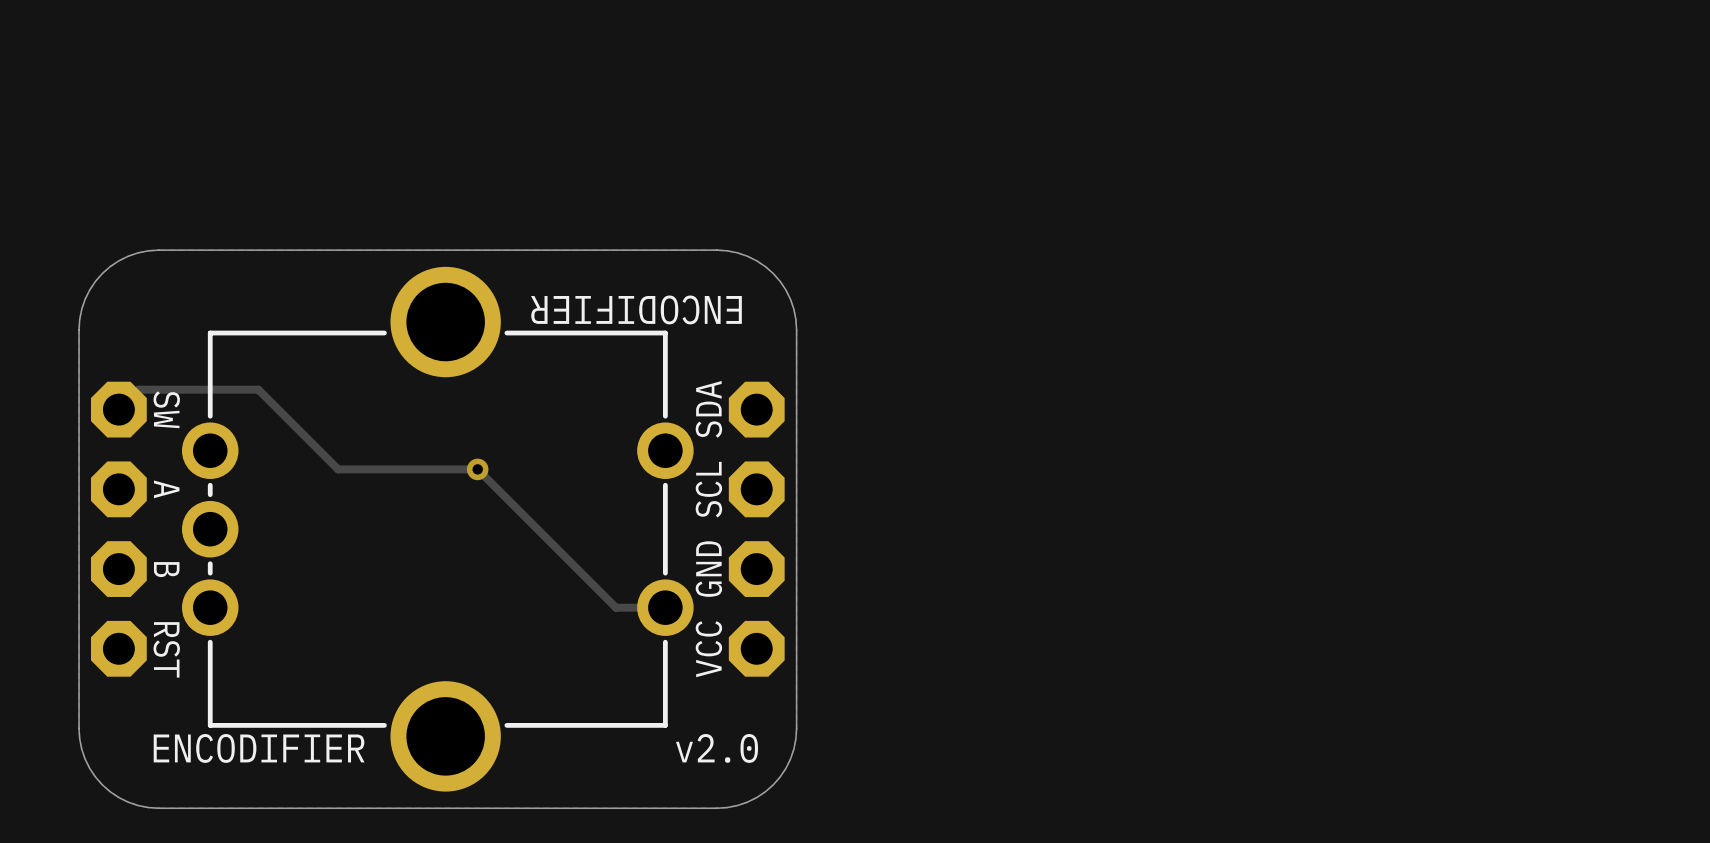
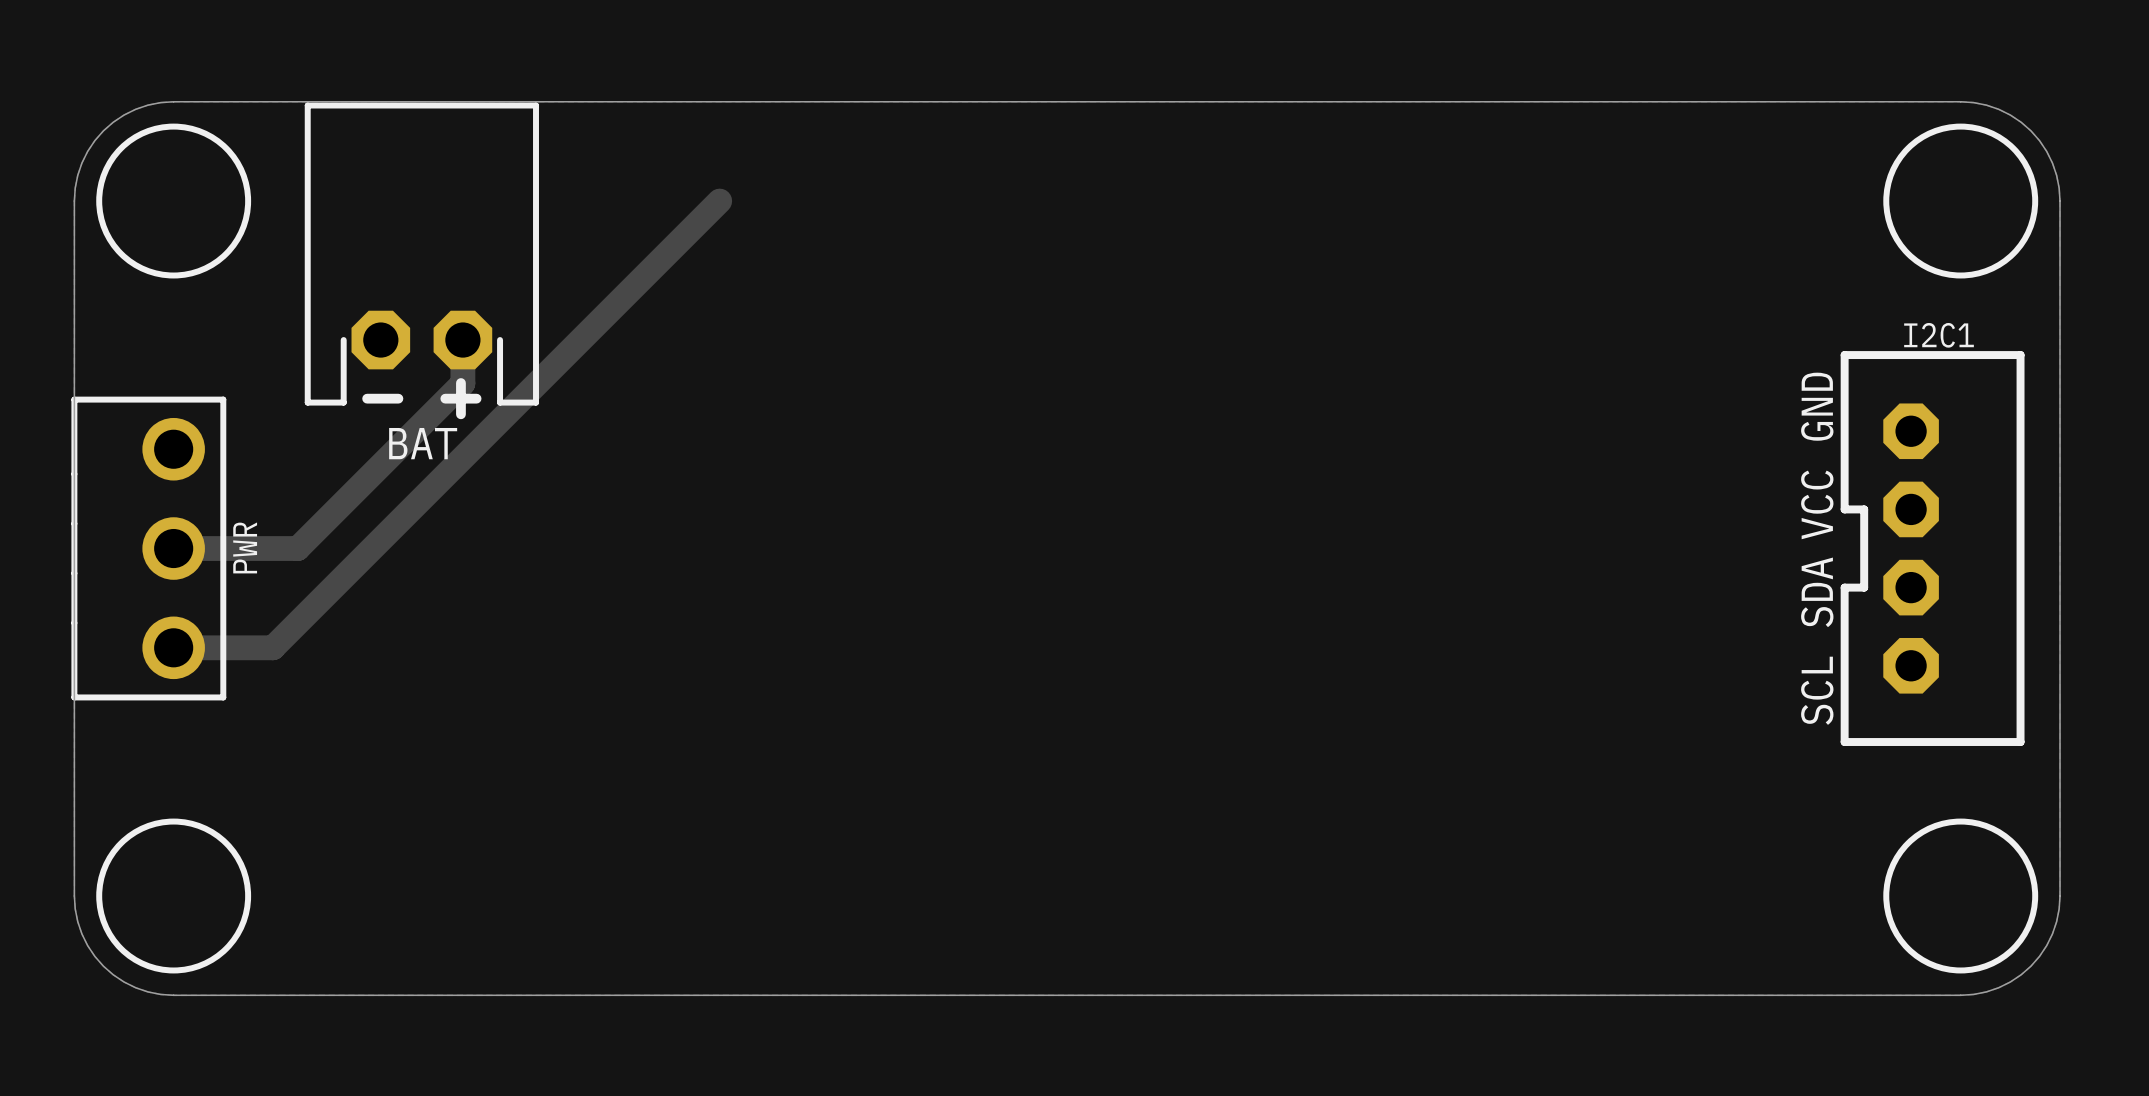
drawing: none -> [96, 123, 252, 279]
drawing: none -> [1883, 123, 2039, 279]
track: none -> (719, 201) (272, 647) (173, 647)
BAT: none -> (421, 260)
track: none -> (462, 340) (462, 383) (297, 548) (173, 548)
text: ENCODIFIER (636, 309) -> none
board edge: (79, 329) (85, 299) (102, 273) (128, 256) (148, 250) (716, 250) (737, 252) (765, 266) (780, 281) (790, 299) (796, 329) (795, 738) (790, 759) (773, 784) (747, 802) (716, 808) -> (74, 399) (74, 201) (77, 175) (87, 151) (103, 130) (113, 122) (135, 109) (160, 102) (1960, 101) (1986, 105) (1998, 109) (2021, 122) (2039, 140) (2052, 163) (2056, 175) (2060, 201) (2060, 896) (2056, 921) (2052, 934) (2039, 956) (2021, 974) (1998, 987) (1986, 991) (1960, 995) (868, 995)
track: (118, 409) (138, 389) (258, 389) (338, 469) (477, 469) (615, 607) (665, 607) -> none
SW: (118, 409) -> none
SDA: (756, 409) -> none
PWR: none -> (148, 548)
I2C1: none -> (1932, 548)
via: (477, 469) -> none
A: (118, 489) -> none
SCL: (756, 489) -> none
part: (437, 529) -> none
B: (118, 569) -> none
GND: (756, 569) -> none
RST: (118, 648) -> none
VCC: (756, 648) -> none
drawing: none -> [96, 818, 252, 974]
drawing: none -> [1883, 818, 2039, 974]
text: ENCODIFIER (259, 748) -> none
text: v2.0 (717, 748) -> none

